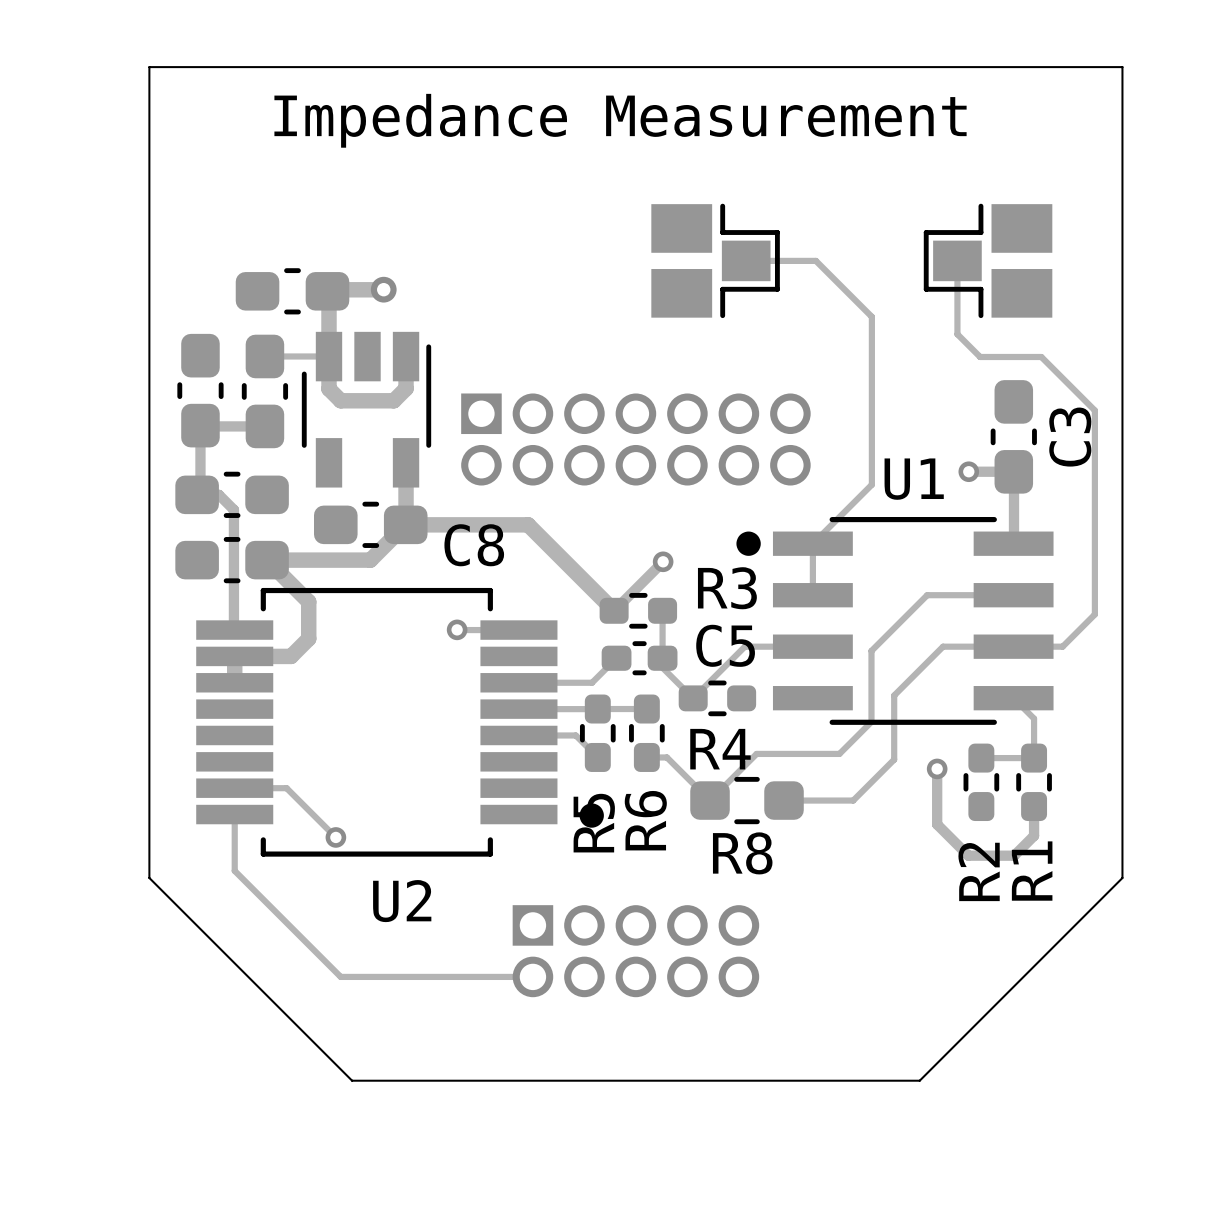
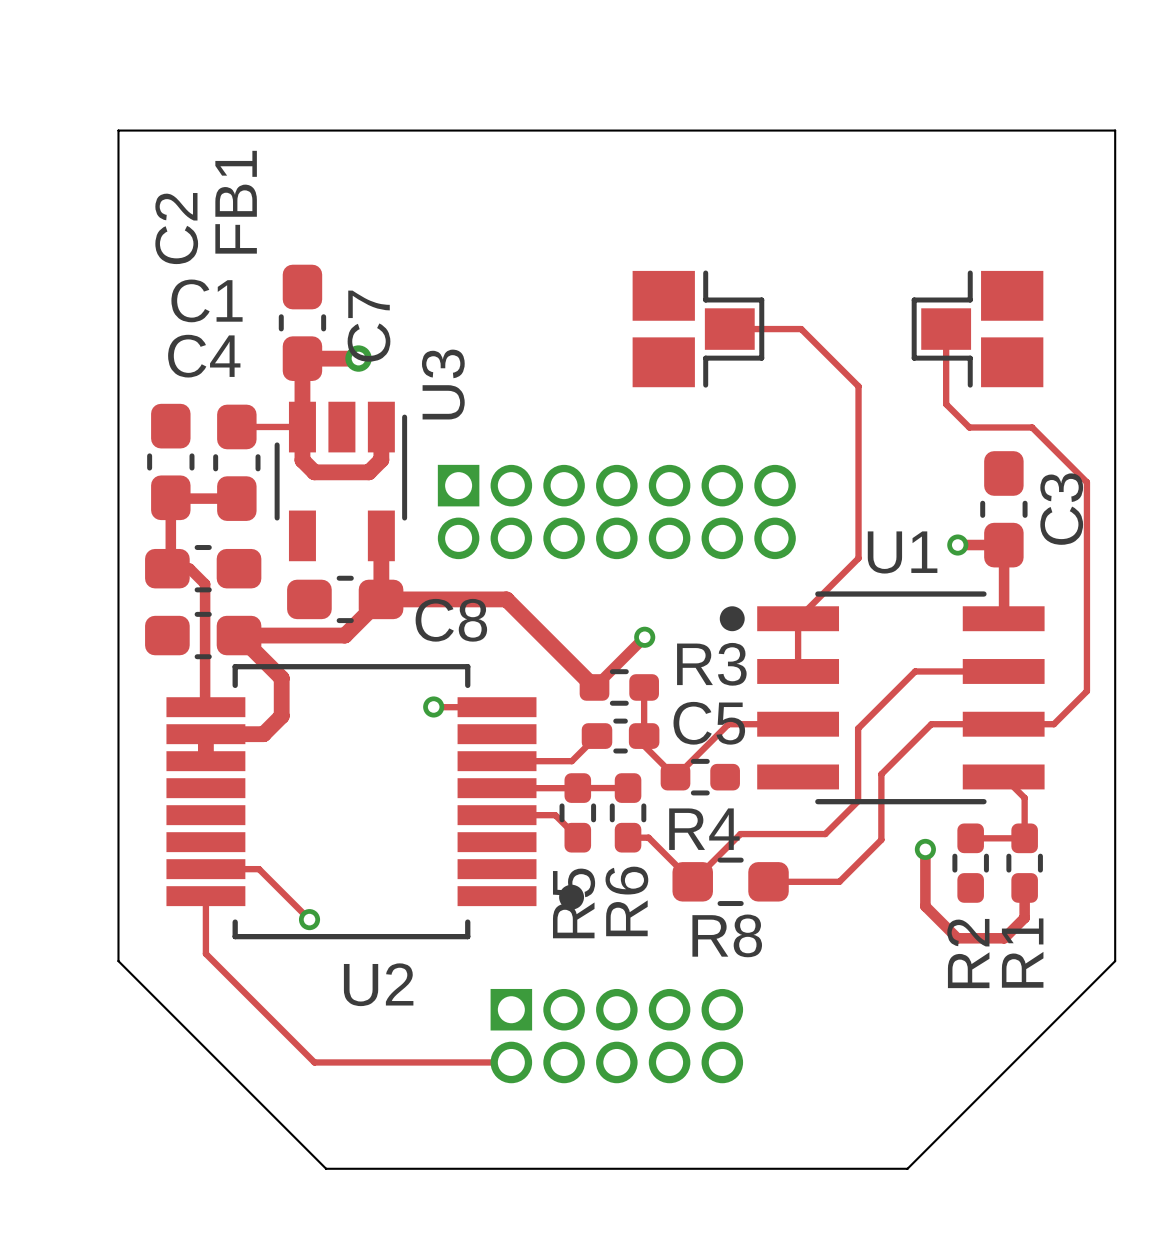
text: Impedance Measurement (620, 120) -> none
FB1 name: none -> FB1 (236, 202)
C2 name: none -> C2 (176, 228)
C1 name: none -> C1 (207, 300)
C7: none -> (302, 322)
C4 name: none -> C4 (204, 356)
part: (292, 291) -> none
U3 name: none -> U3 (443, 384)

